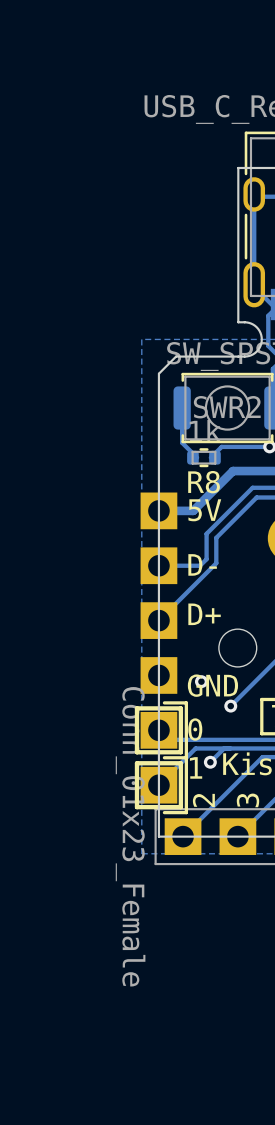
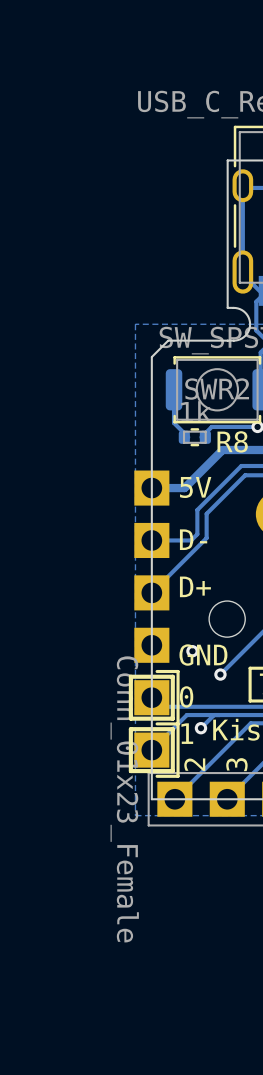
R8 name position: R8 (204, 482) -> R8 (232, 441)

